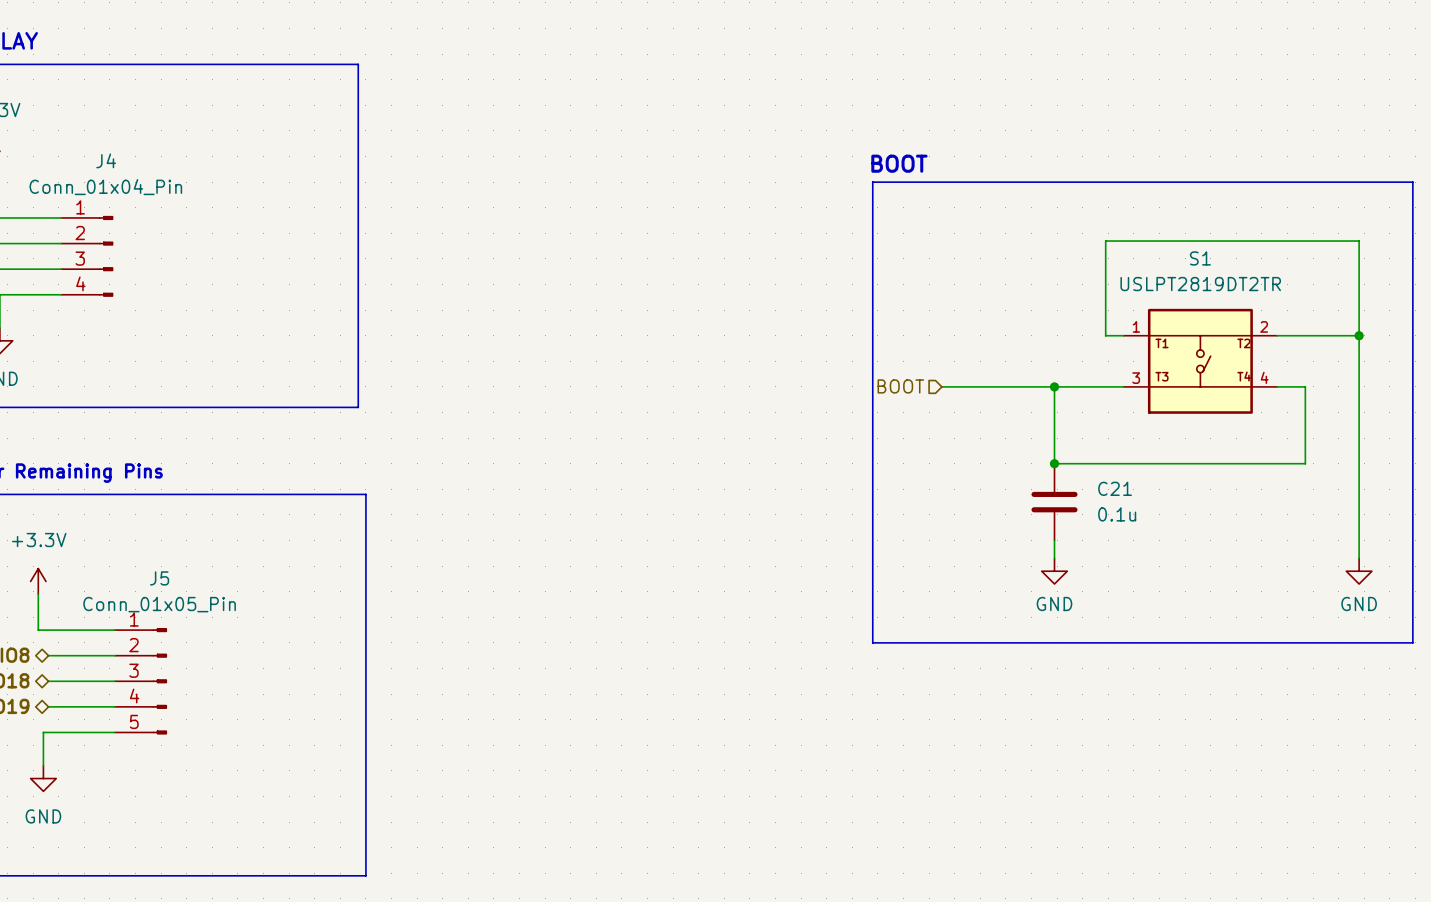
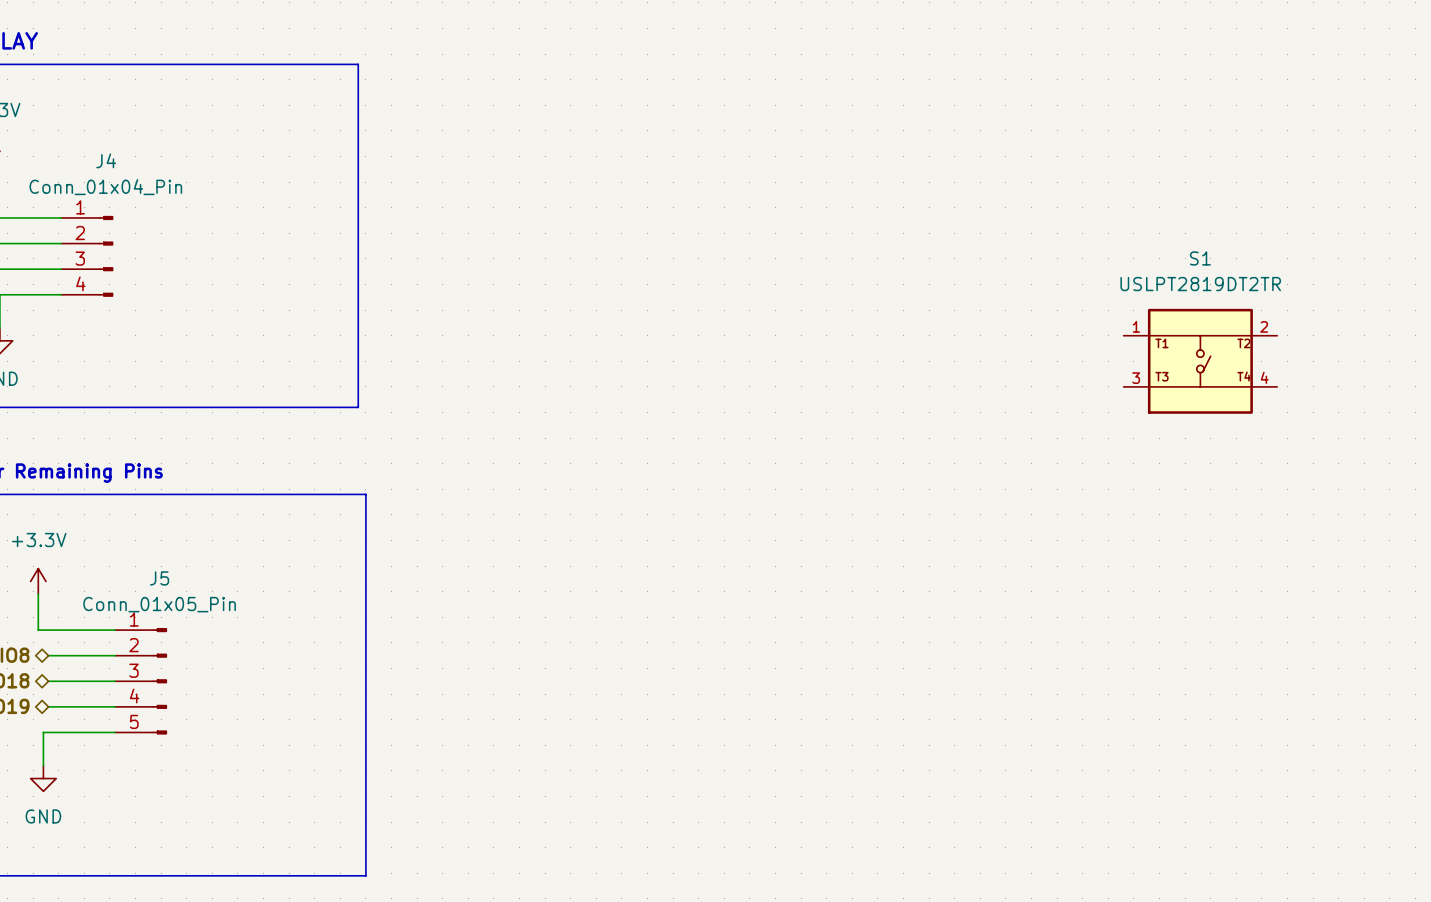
text: BOOT (899, 163) -> none
line: (872, 182) (1412, 182) (1412, 642) (872, 642) (872, 182) -> none
wire: (1123, 335) (1105, 335) (1105, 241) (1359, 241) (1359, 558) -> none
wire: (1277, 335) (1359, 335) -> none
junction: (1359, 335) -> none
hierarchical label: BOOT (900, 386) -> none
wire: (941, 386) (1123, 386) -> none
wire: (1054, 386) (1054, 463) (1305, 463) (1305, 386) (1277, 386) -> none
junction: (1054, 386) -> none
junction: (1054, 463) -> none
C21: 0.1u (1054, 502) -> none
wire: (1054, 540) (1054, 558) -> none
power symbol: GND (1054, 571) -> none
power symbol: GND (1359, 571) -> none

